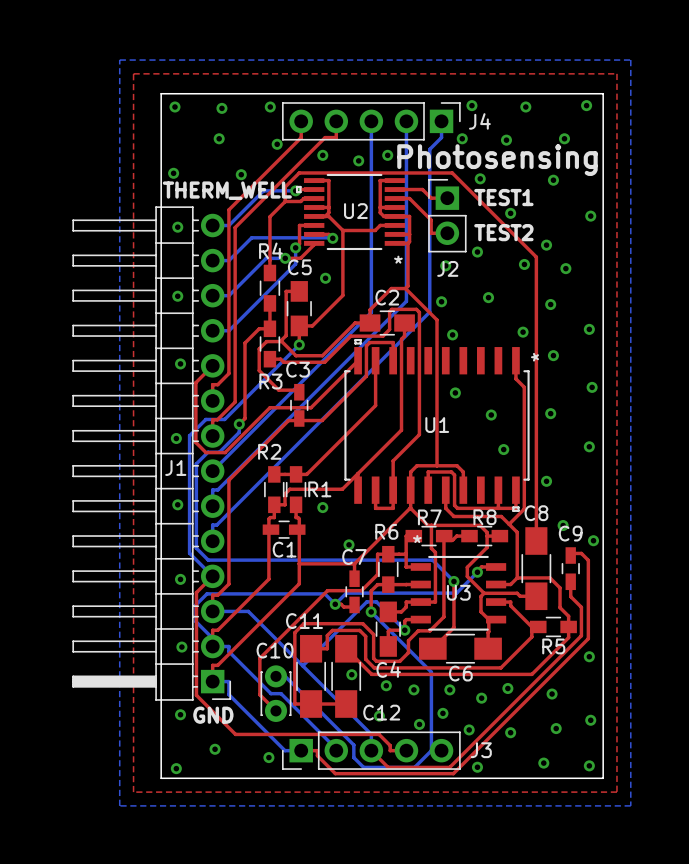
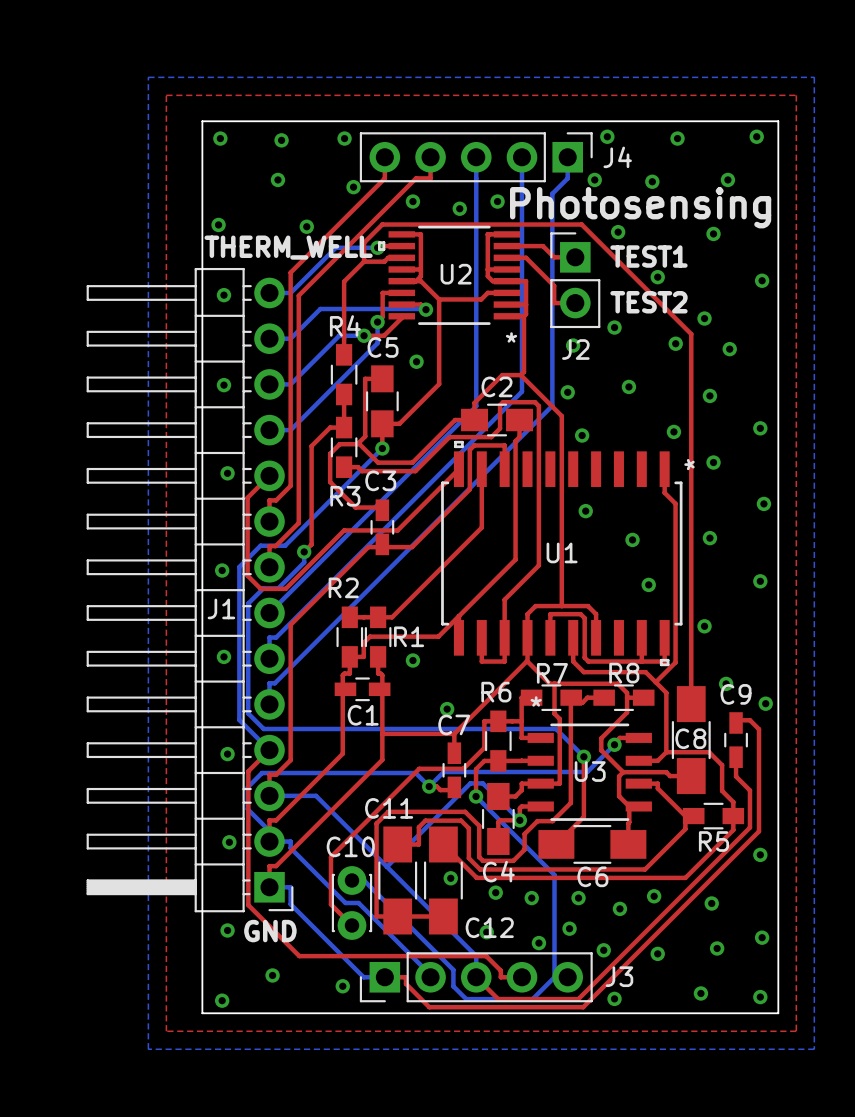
C8 name position: C8 (536, 513) -> C8 (690, 738)

